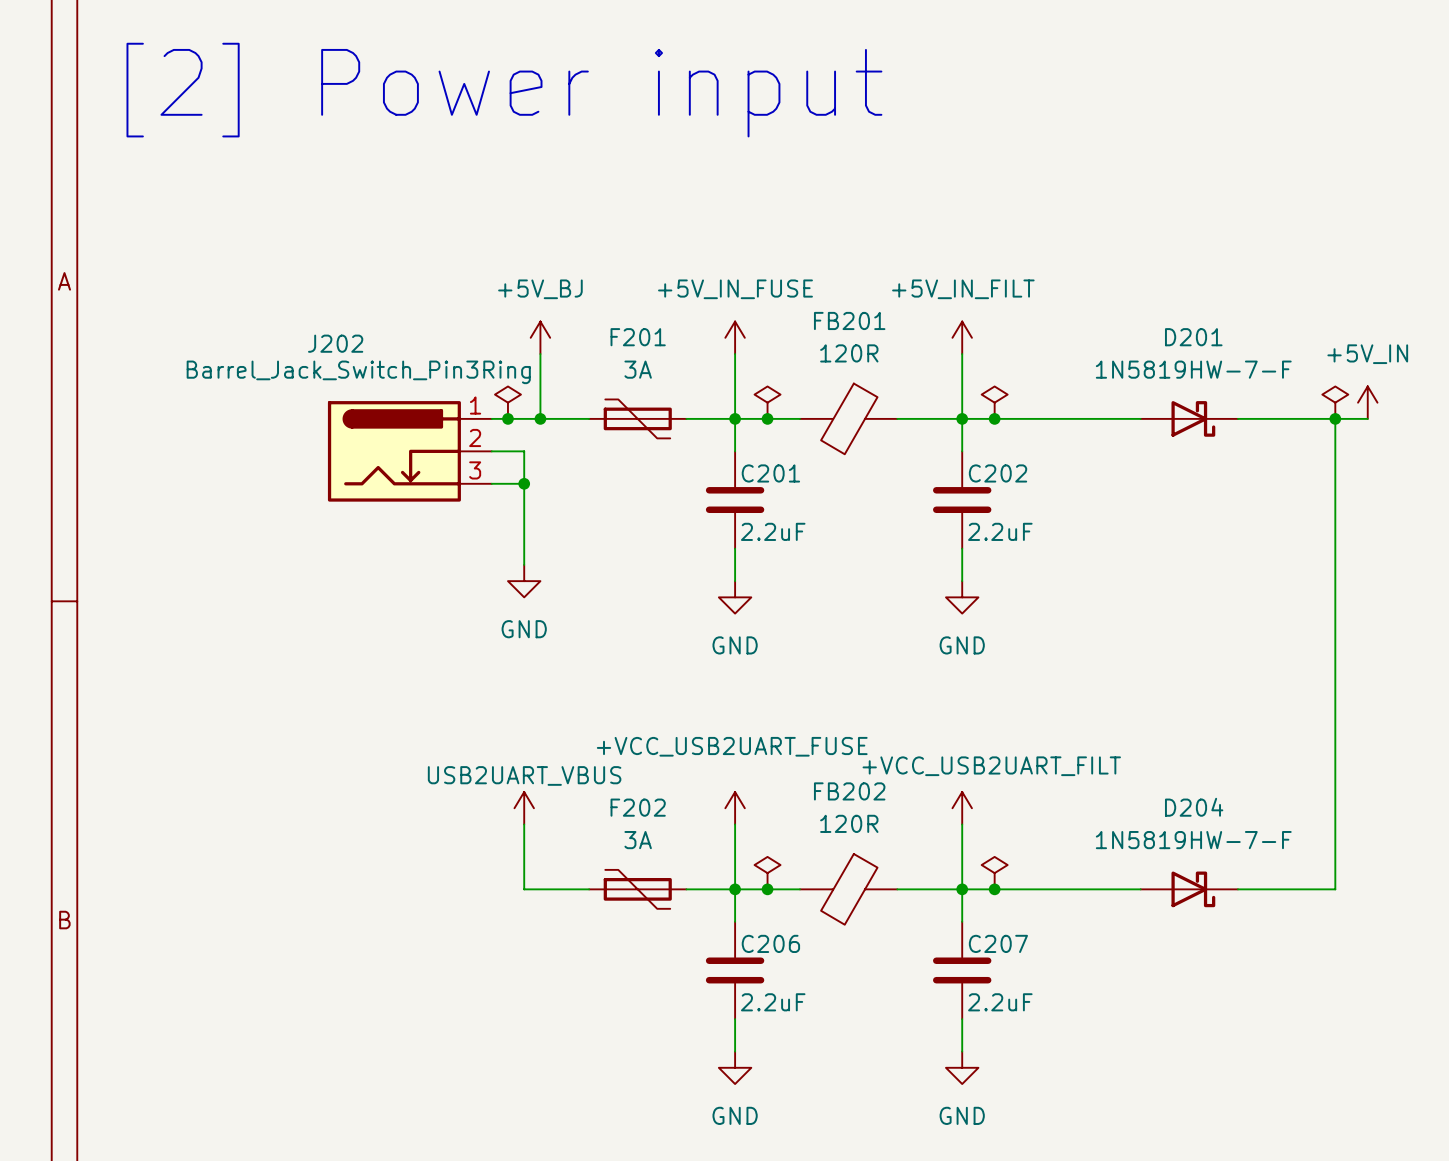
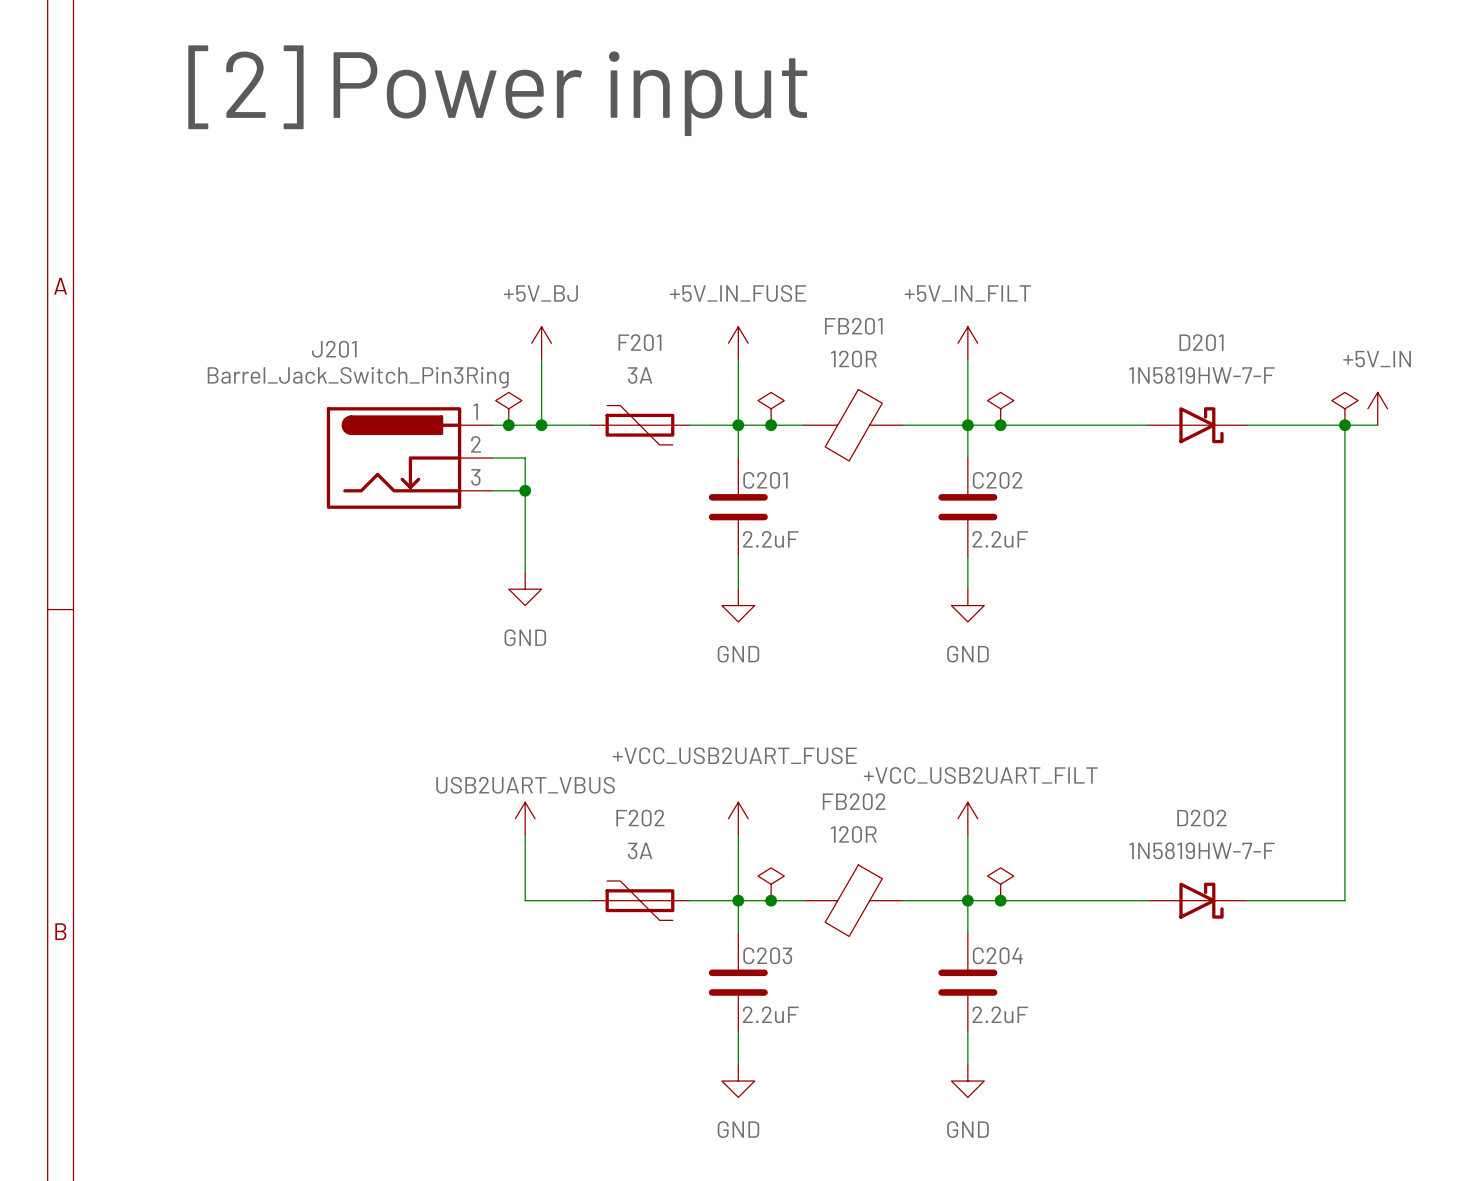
J202 name: J202 (335, 343) -> J201 (334, 349)
D204 name: D204 (1194, 807) -> D202 (1201, 818)
C206 name: C206 (770, 943) -> C203 (767, 955)
C207 name: C207 (998, 943) -> C204 (997, 955)

